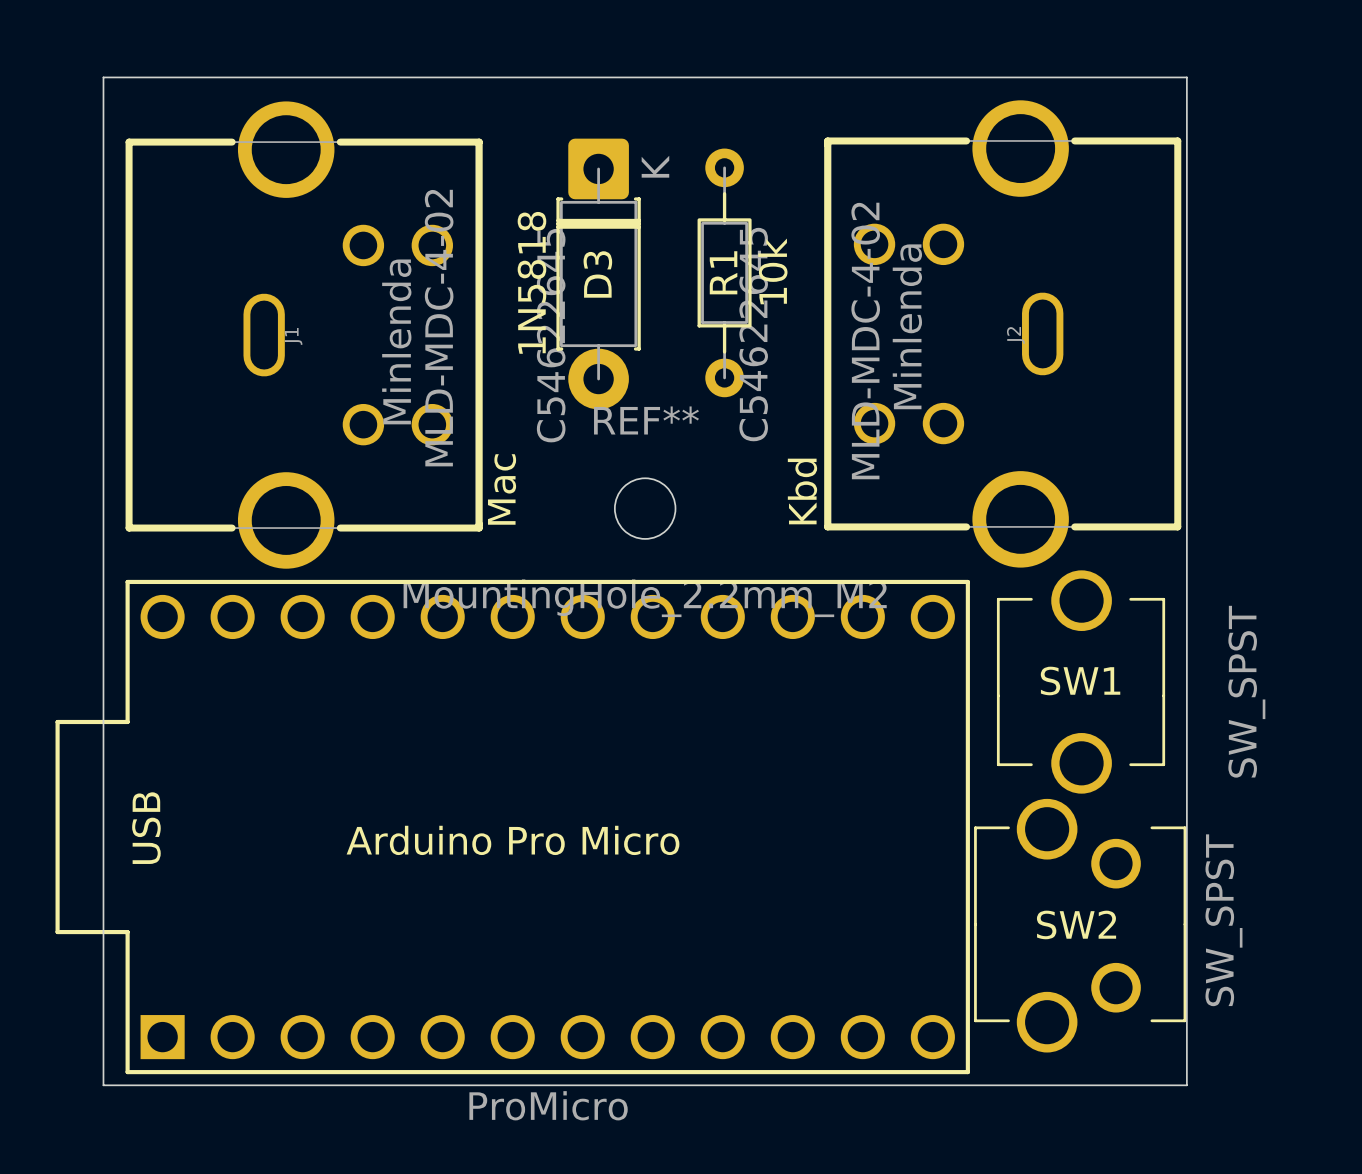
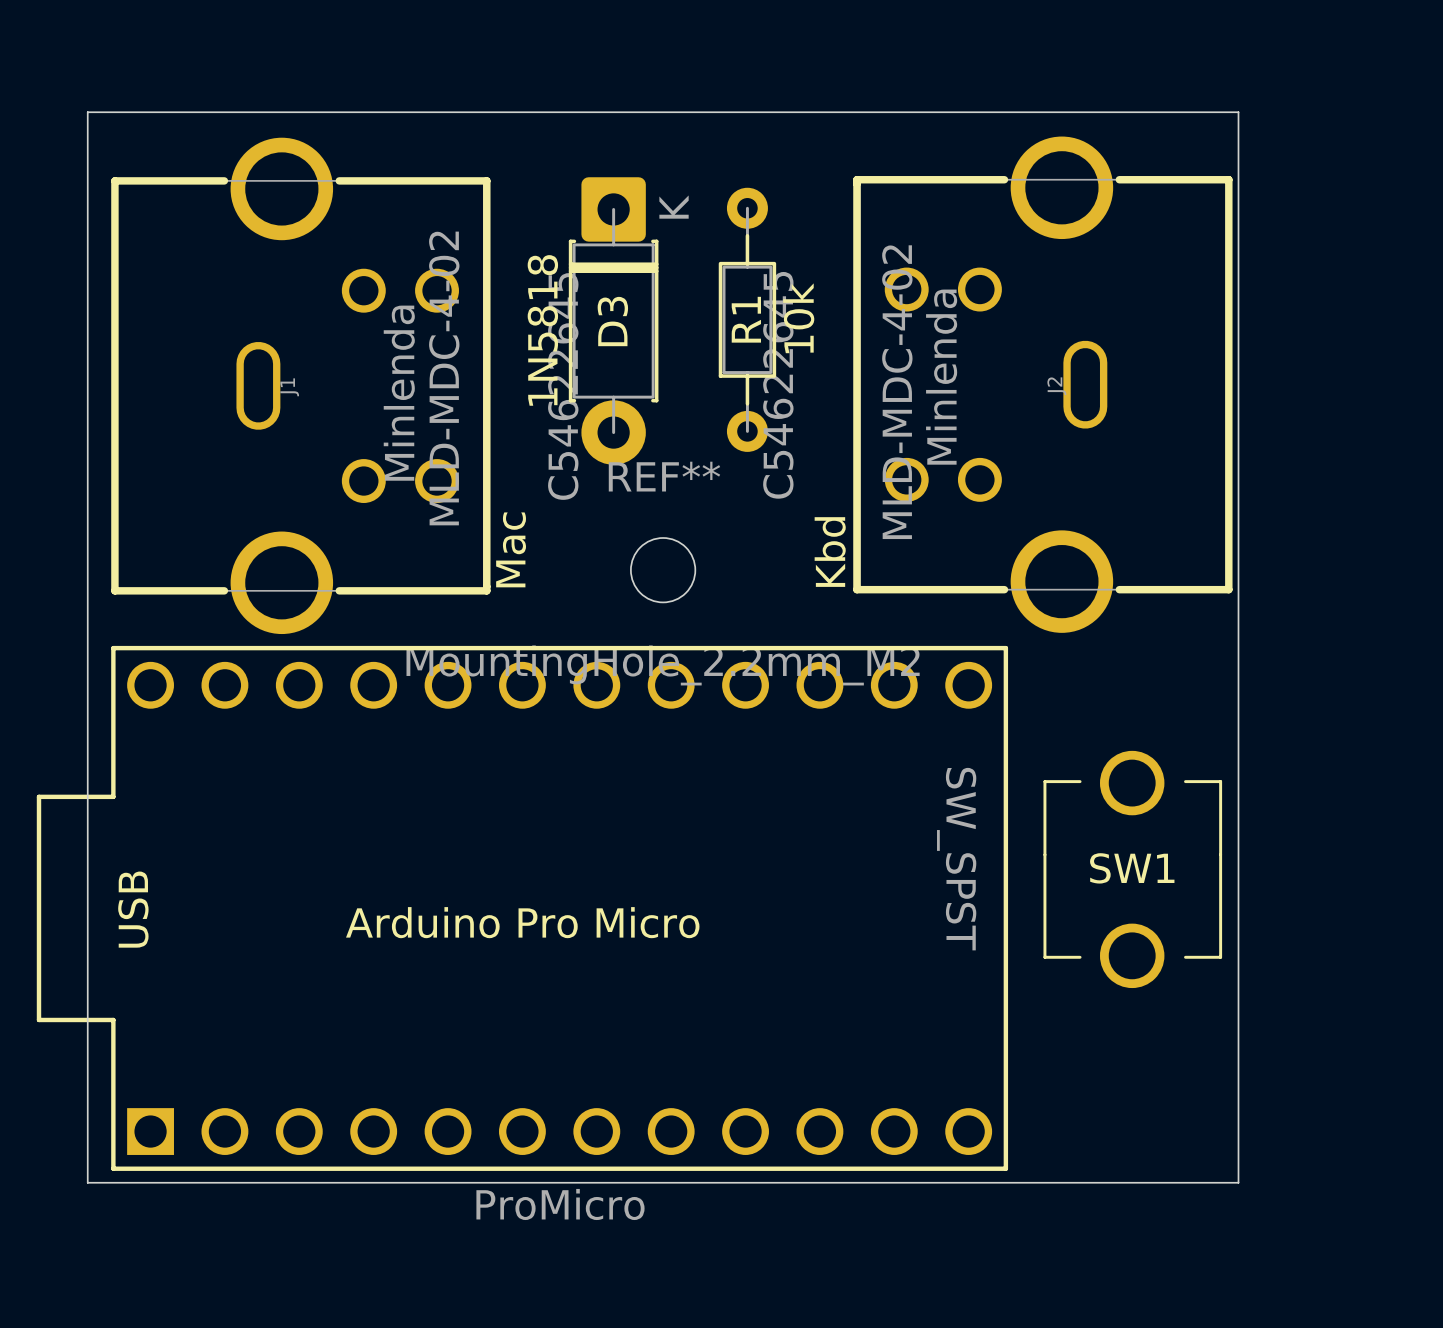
SW1 rotation: 0° (1081, 682) -> 180° (1132, 869)
SW2: SW_SPST (1080, 925) -> none

